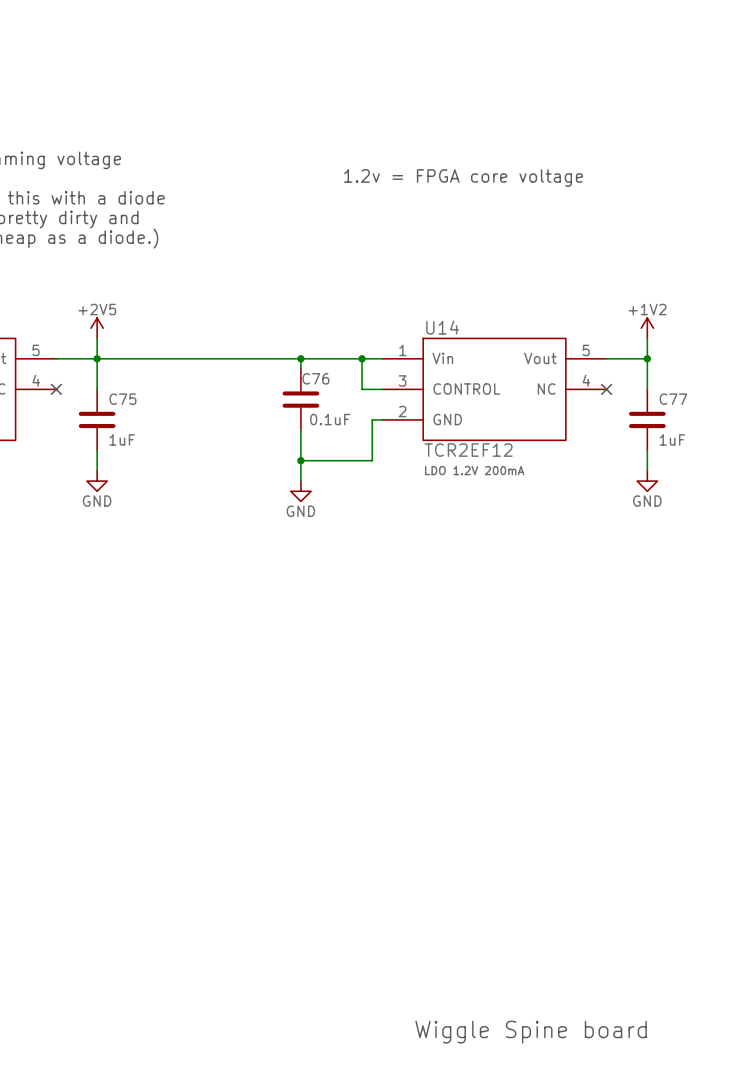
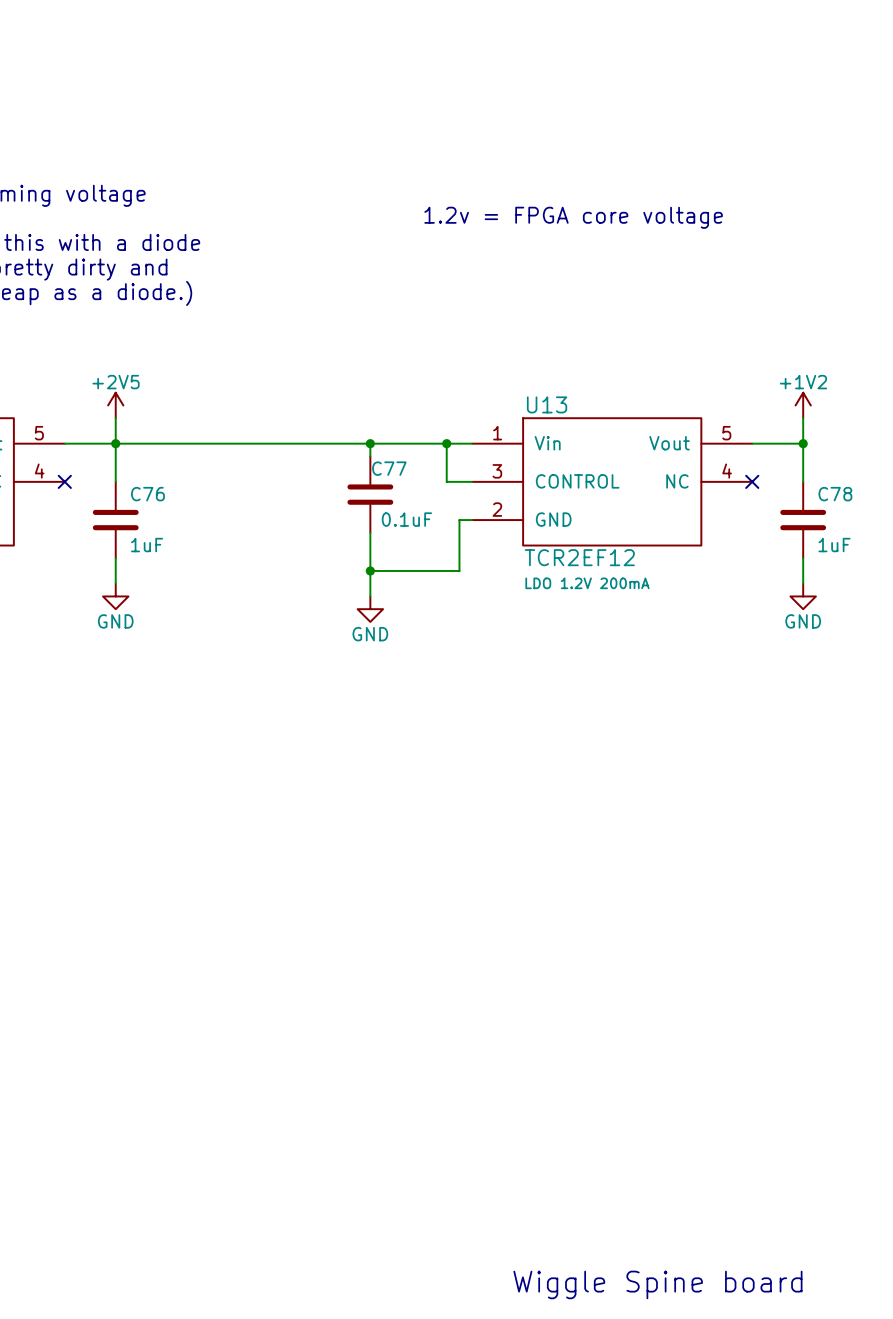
U14 name: U14 (442, 327) -> U13 (547, 404)
C76 name: C76 (315, 378) -> C77 (389, 468)
C75 name: C75 (122, 399) -> C76 (147, 494)
C77 name: C77 (673, 399) -> C78 (835, 494)

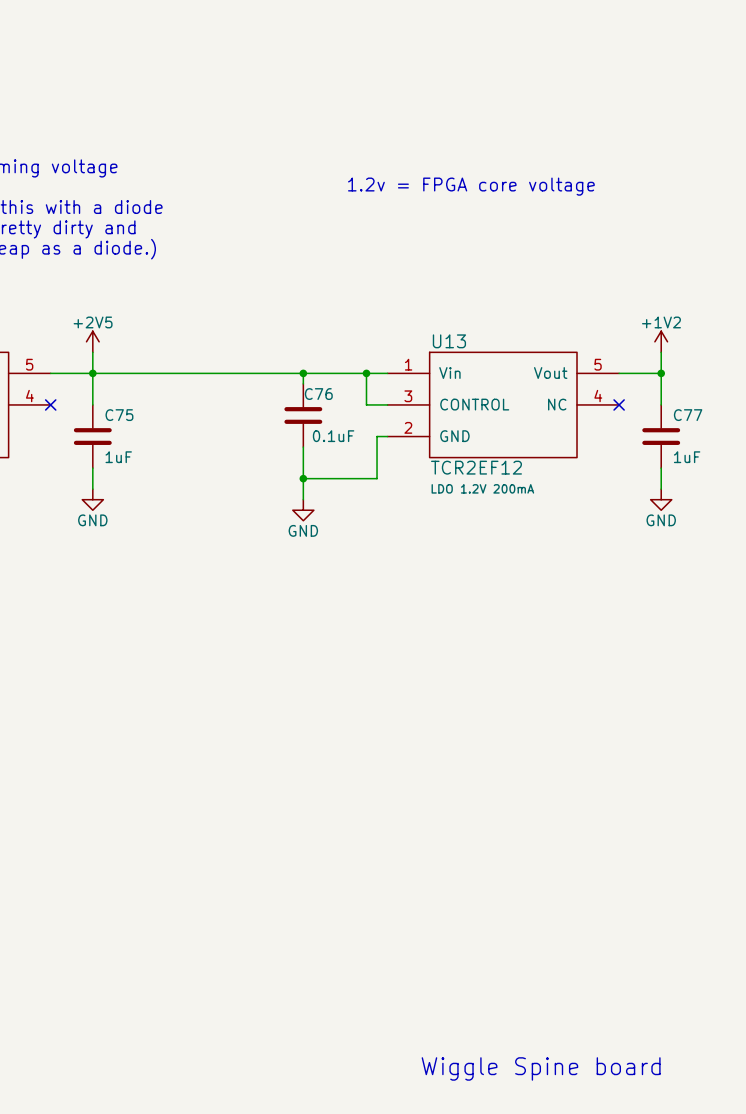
C77 name: C77 (389, 468) -> C76 (318, 394)
C76 name: C76 (147, 494) -> C75 (119, 415)
C78 name: C78 (835, 494) -> C77 (688, 415)

